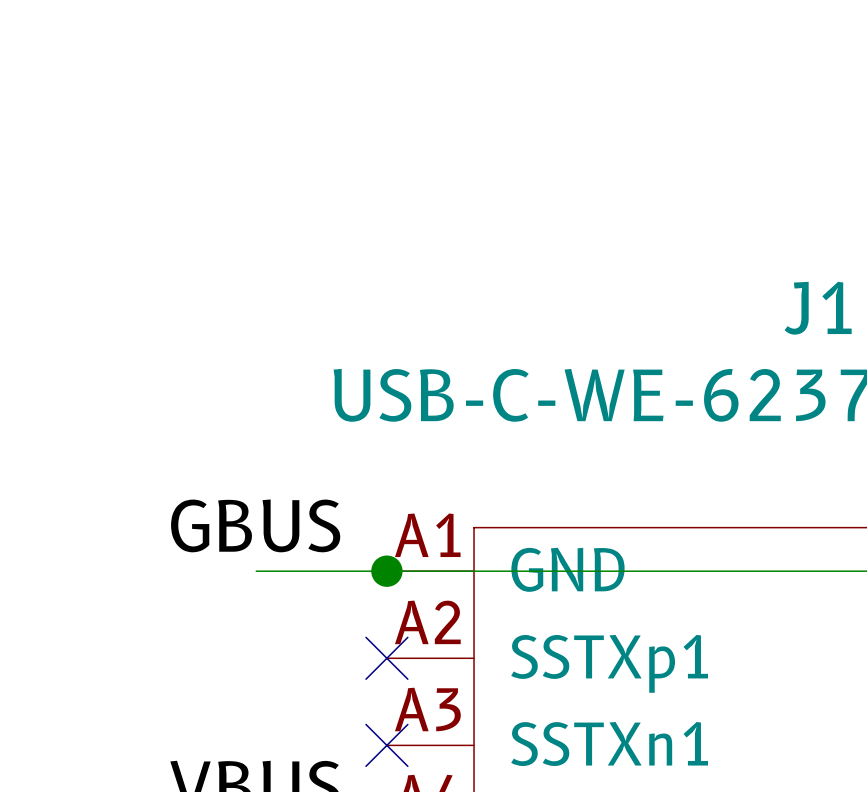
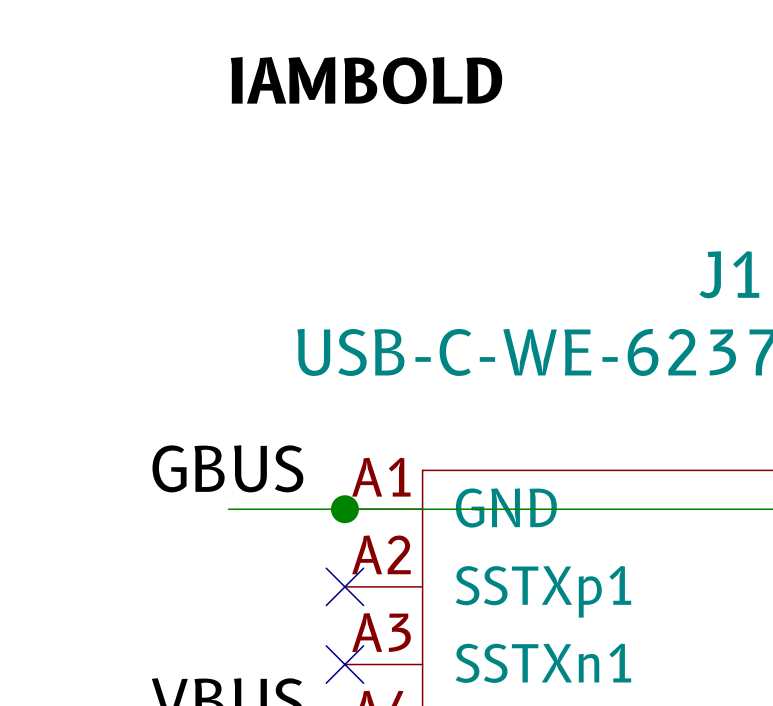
label: none -> IAMBOLD (366, 80)

